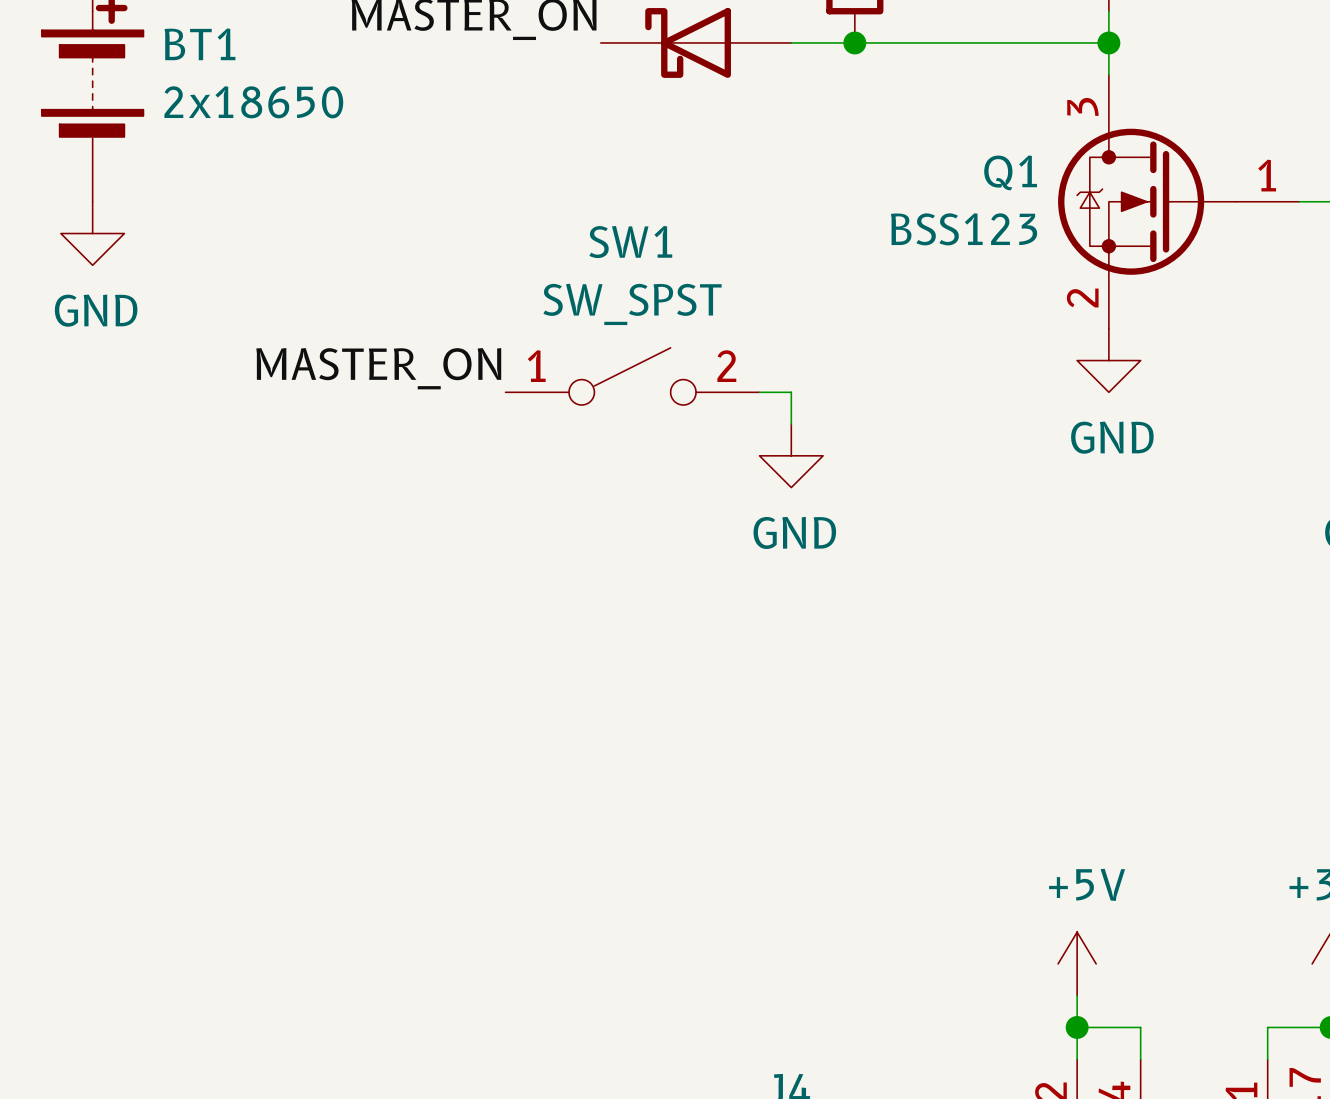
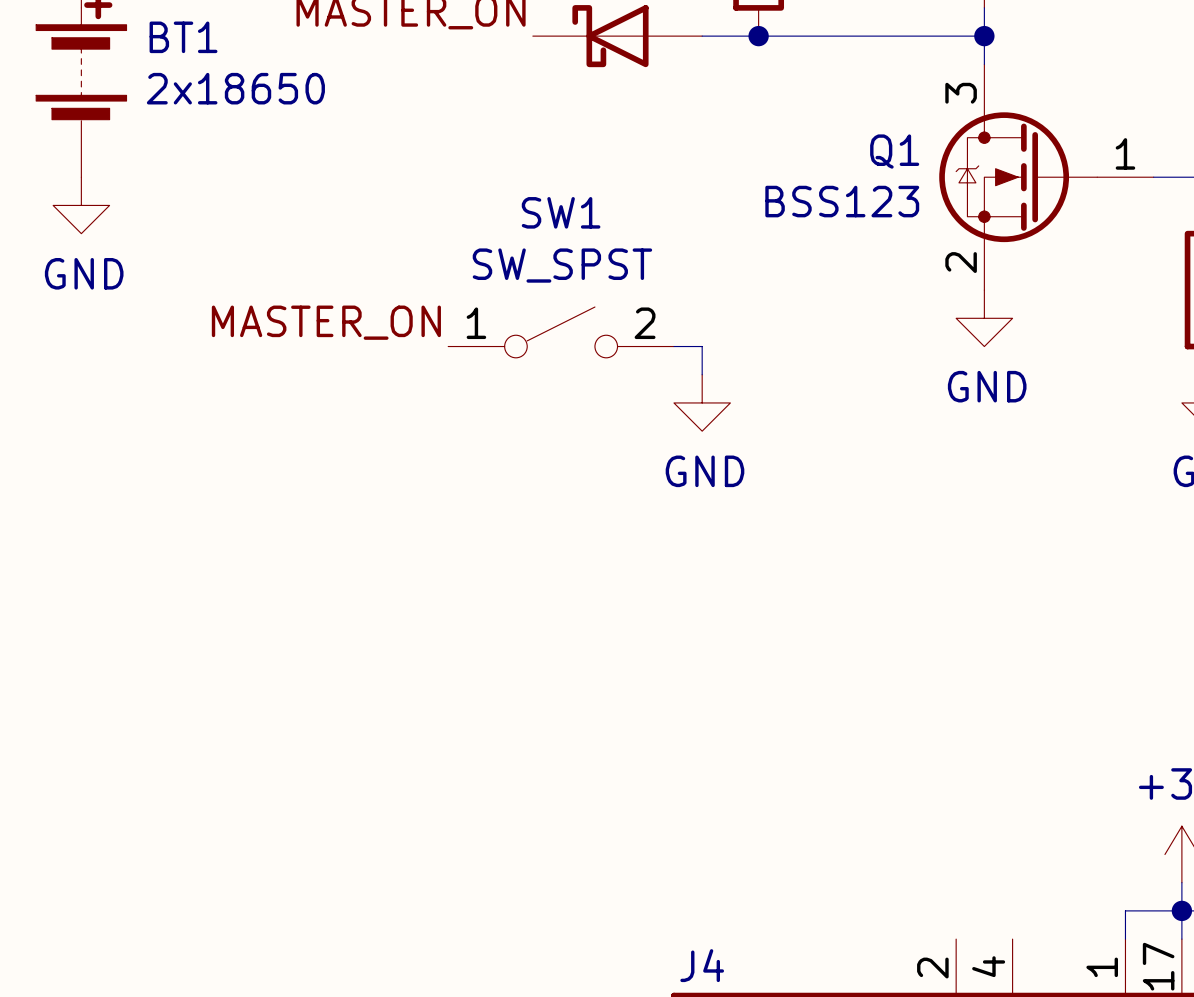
power symbol: +5V (1077, 963) -> none
wire: (1077, 995) (1077, 1059) -> none
wire: (1077, 1027) (1140, 1027) (1140, 1059) -> none
junction: (1077, 1027) -> none

